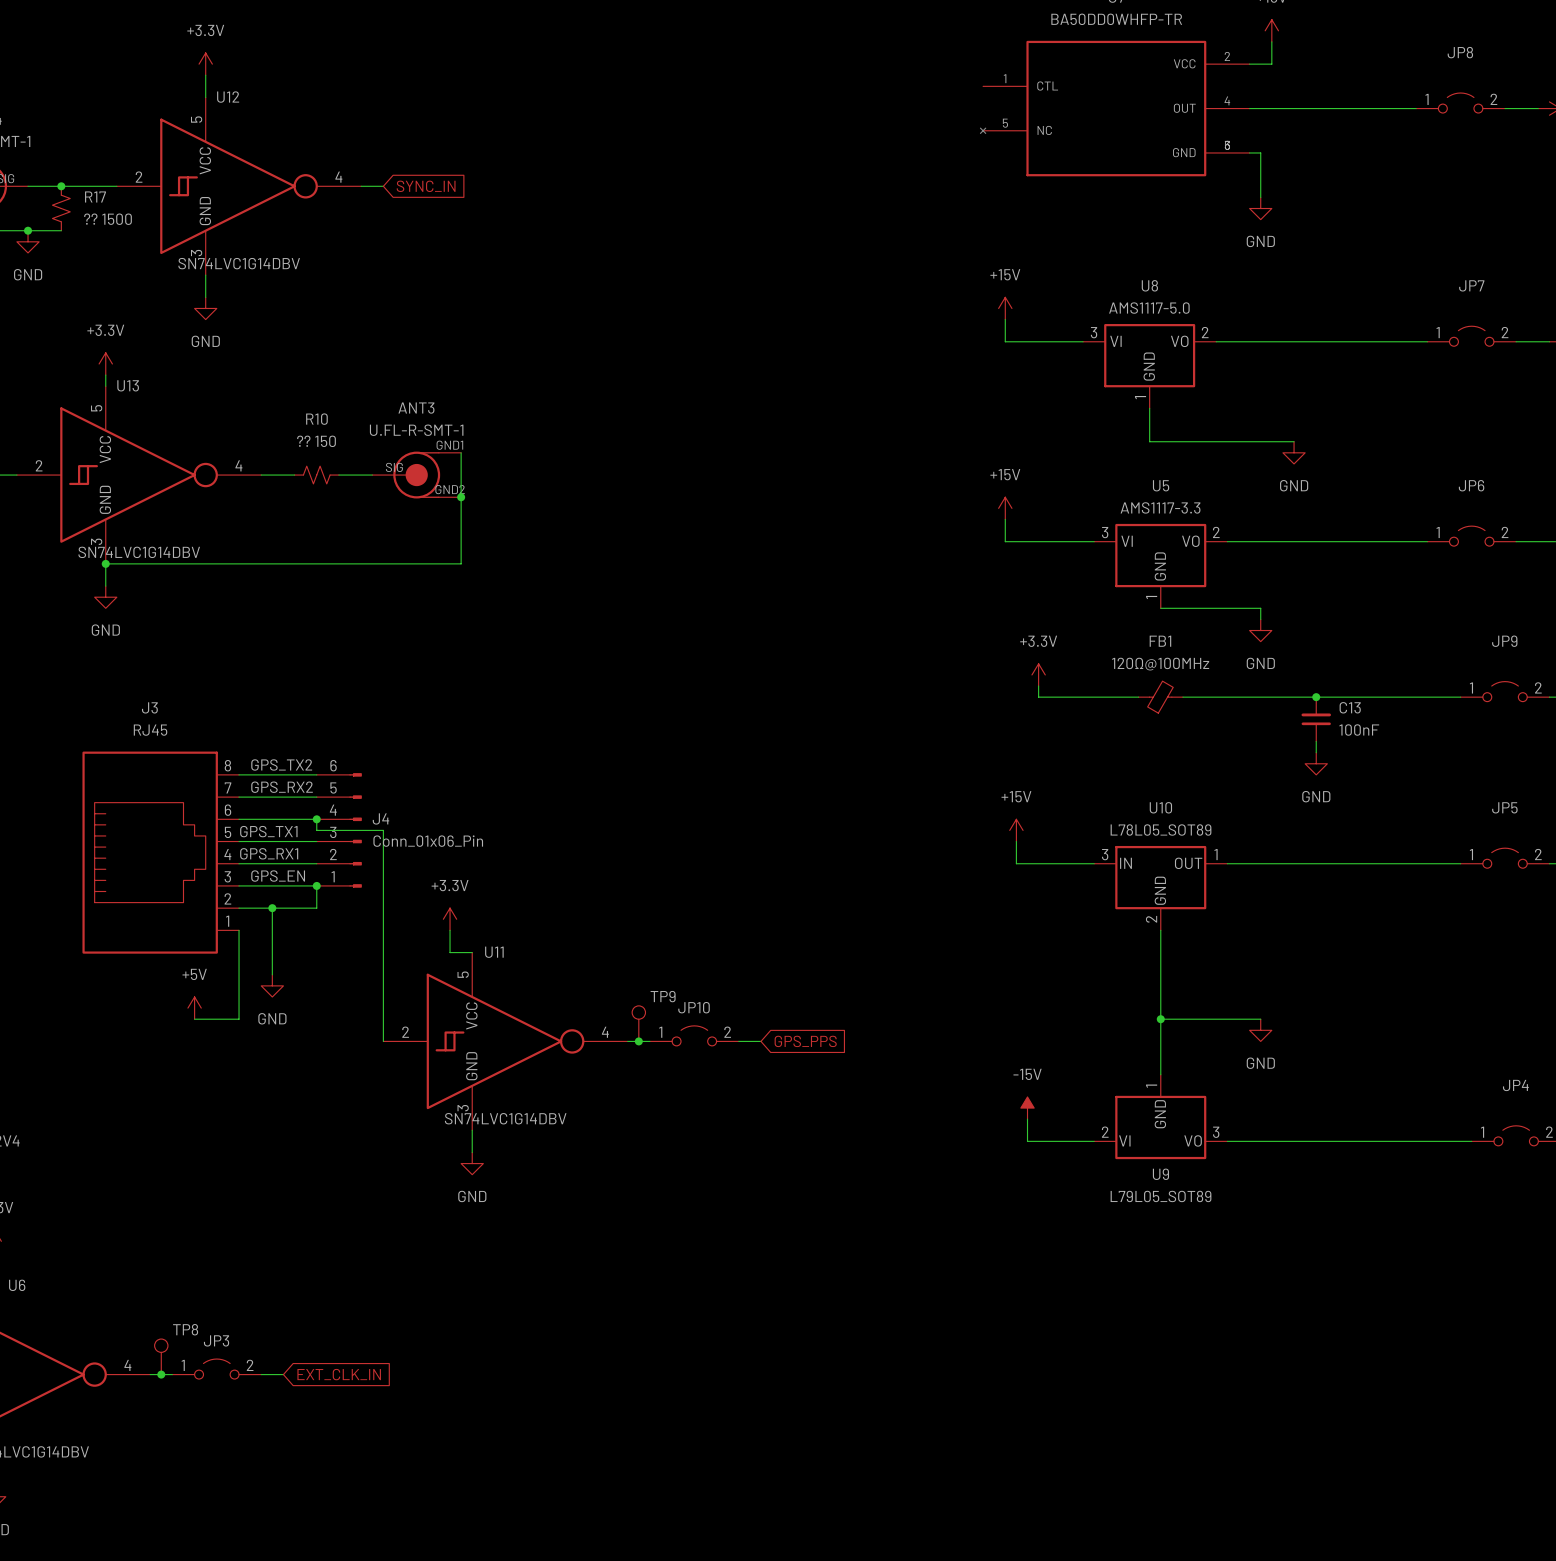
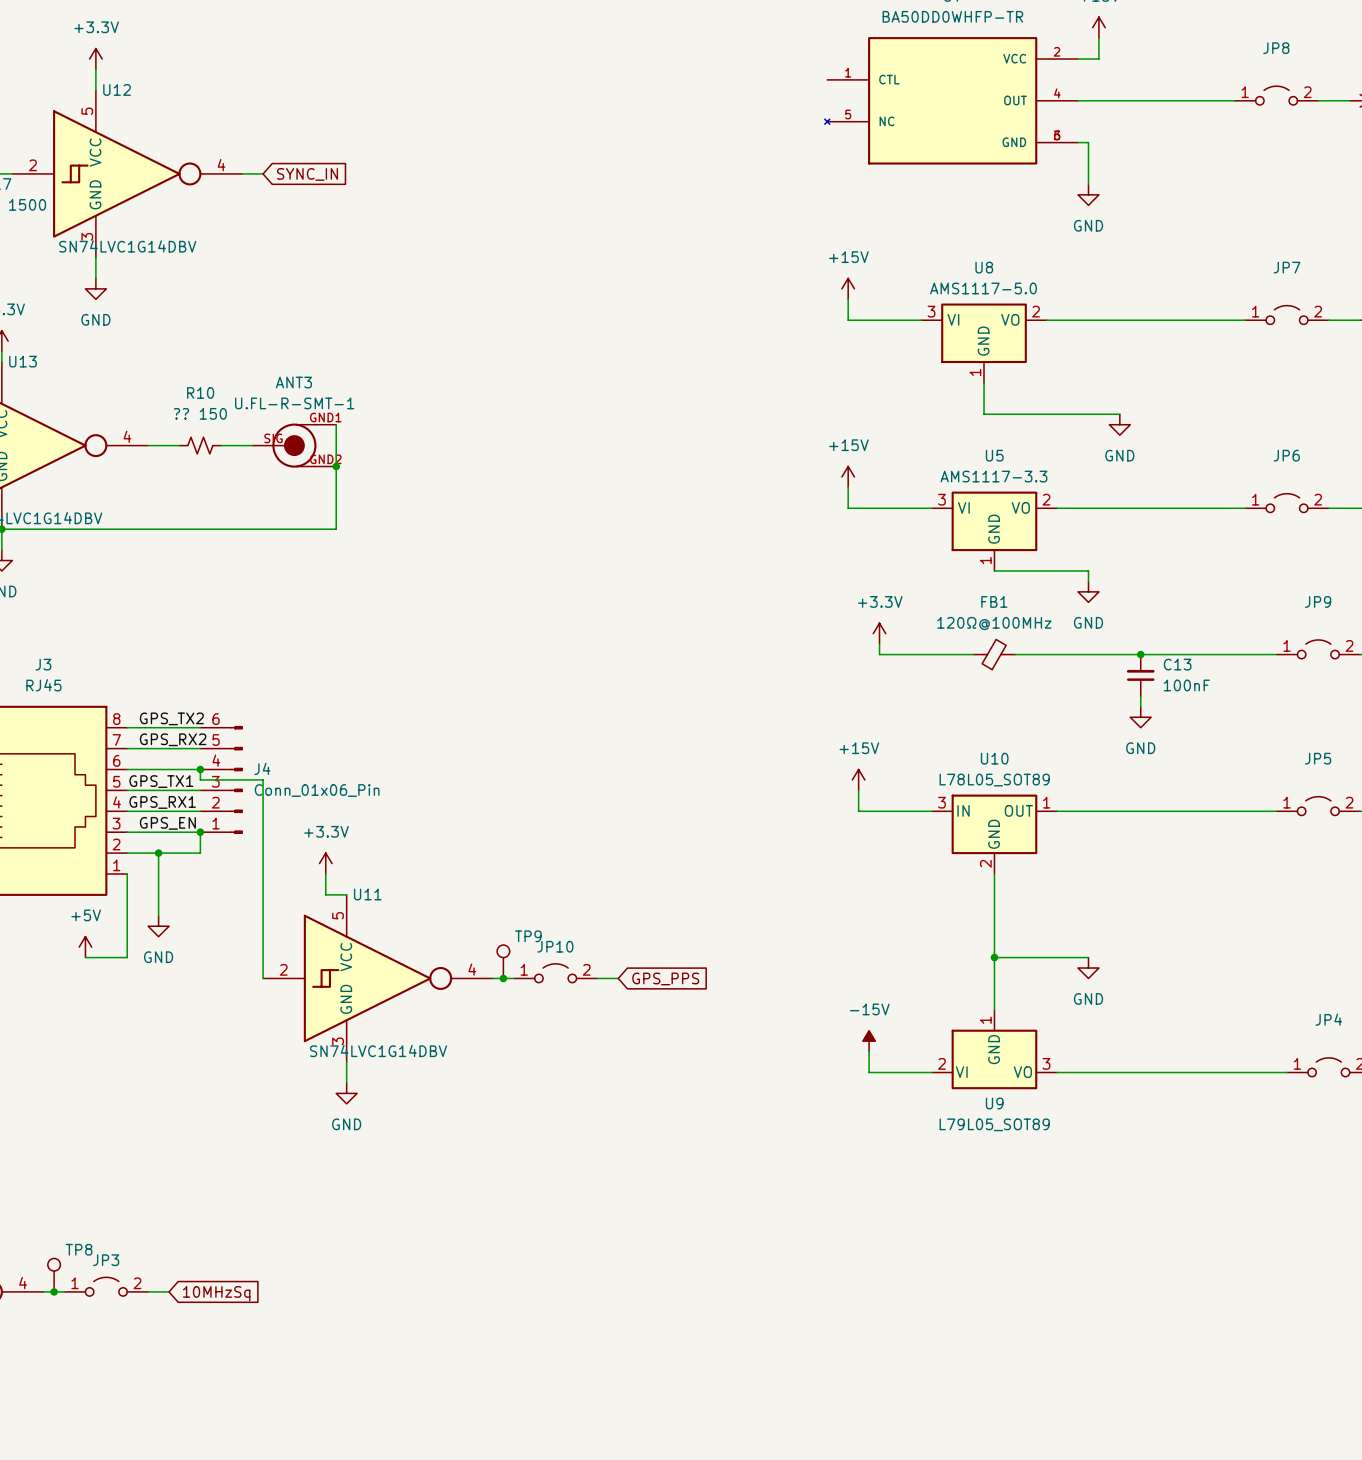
global label: EXT_CLK_IN (339, 1374) -> 10MHzSq (216, 1293)

